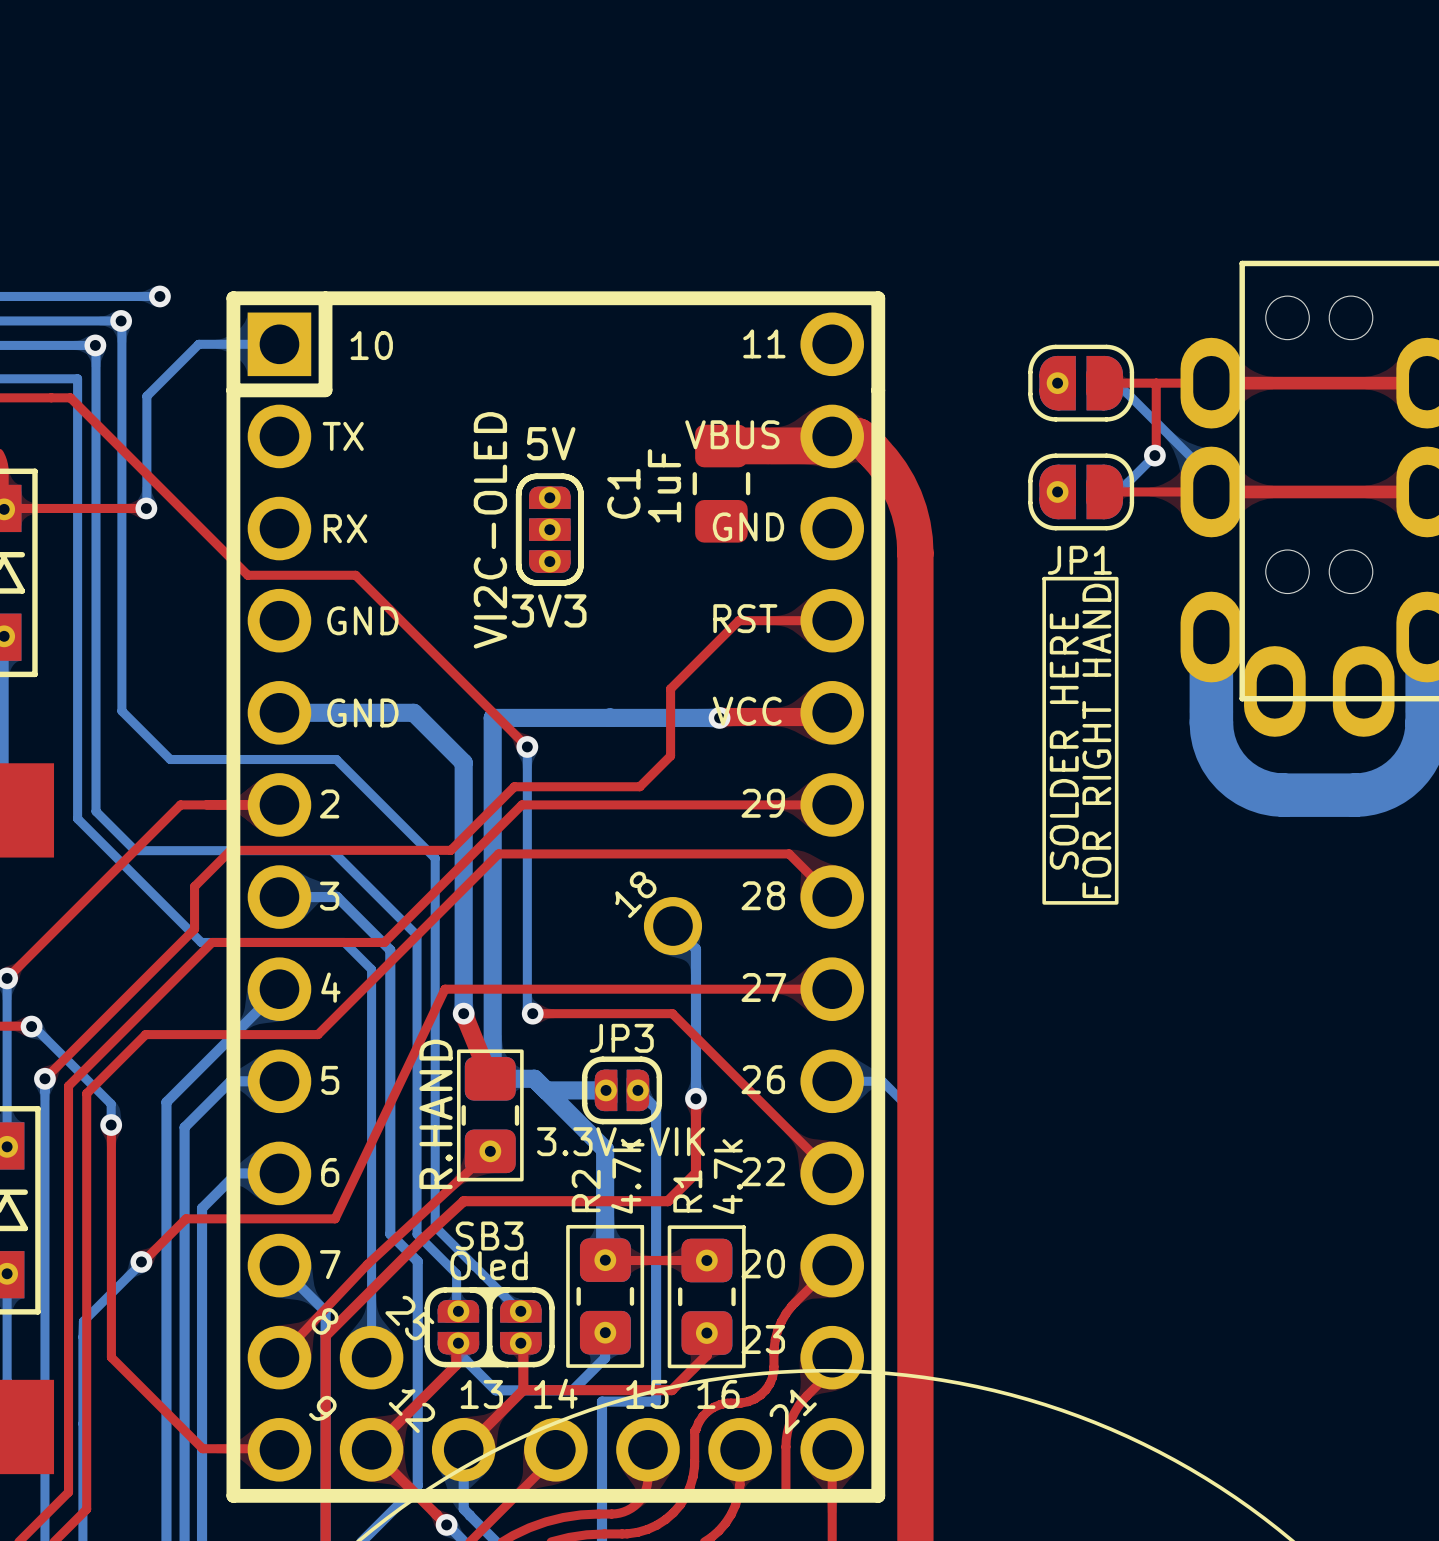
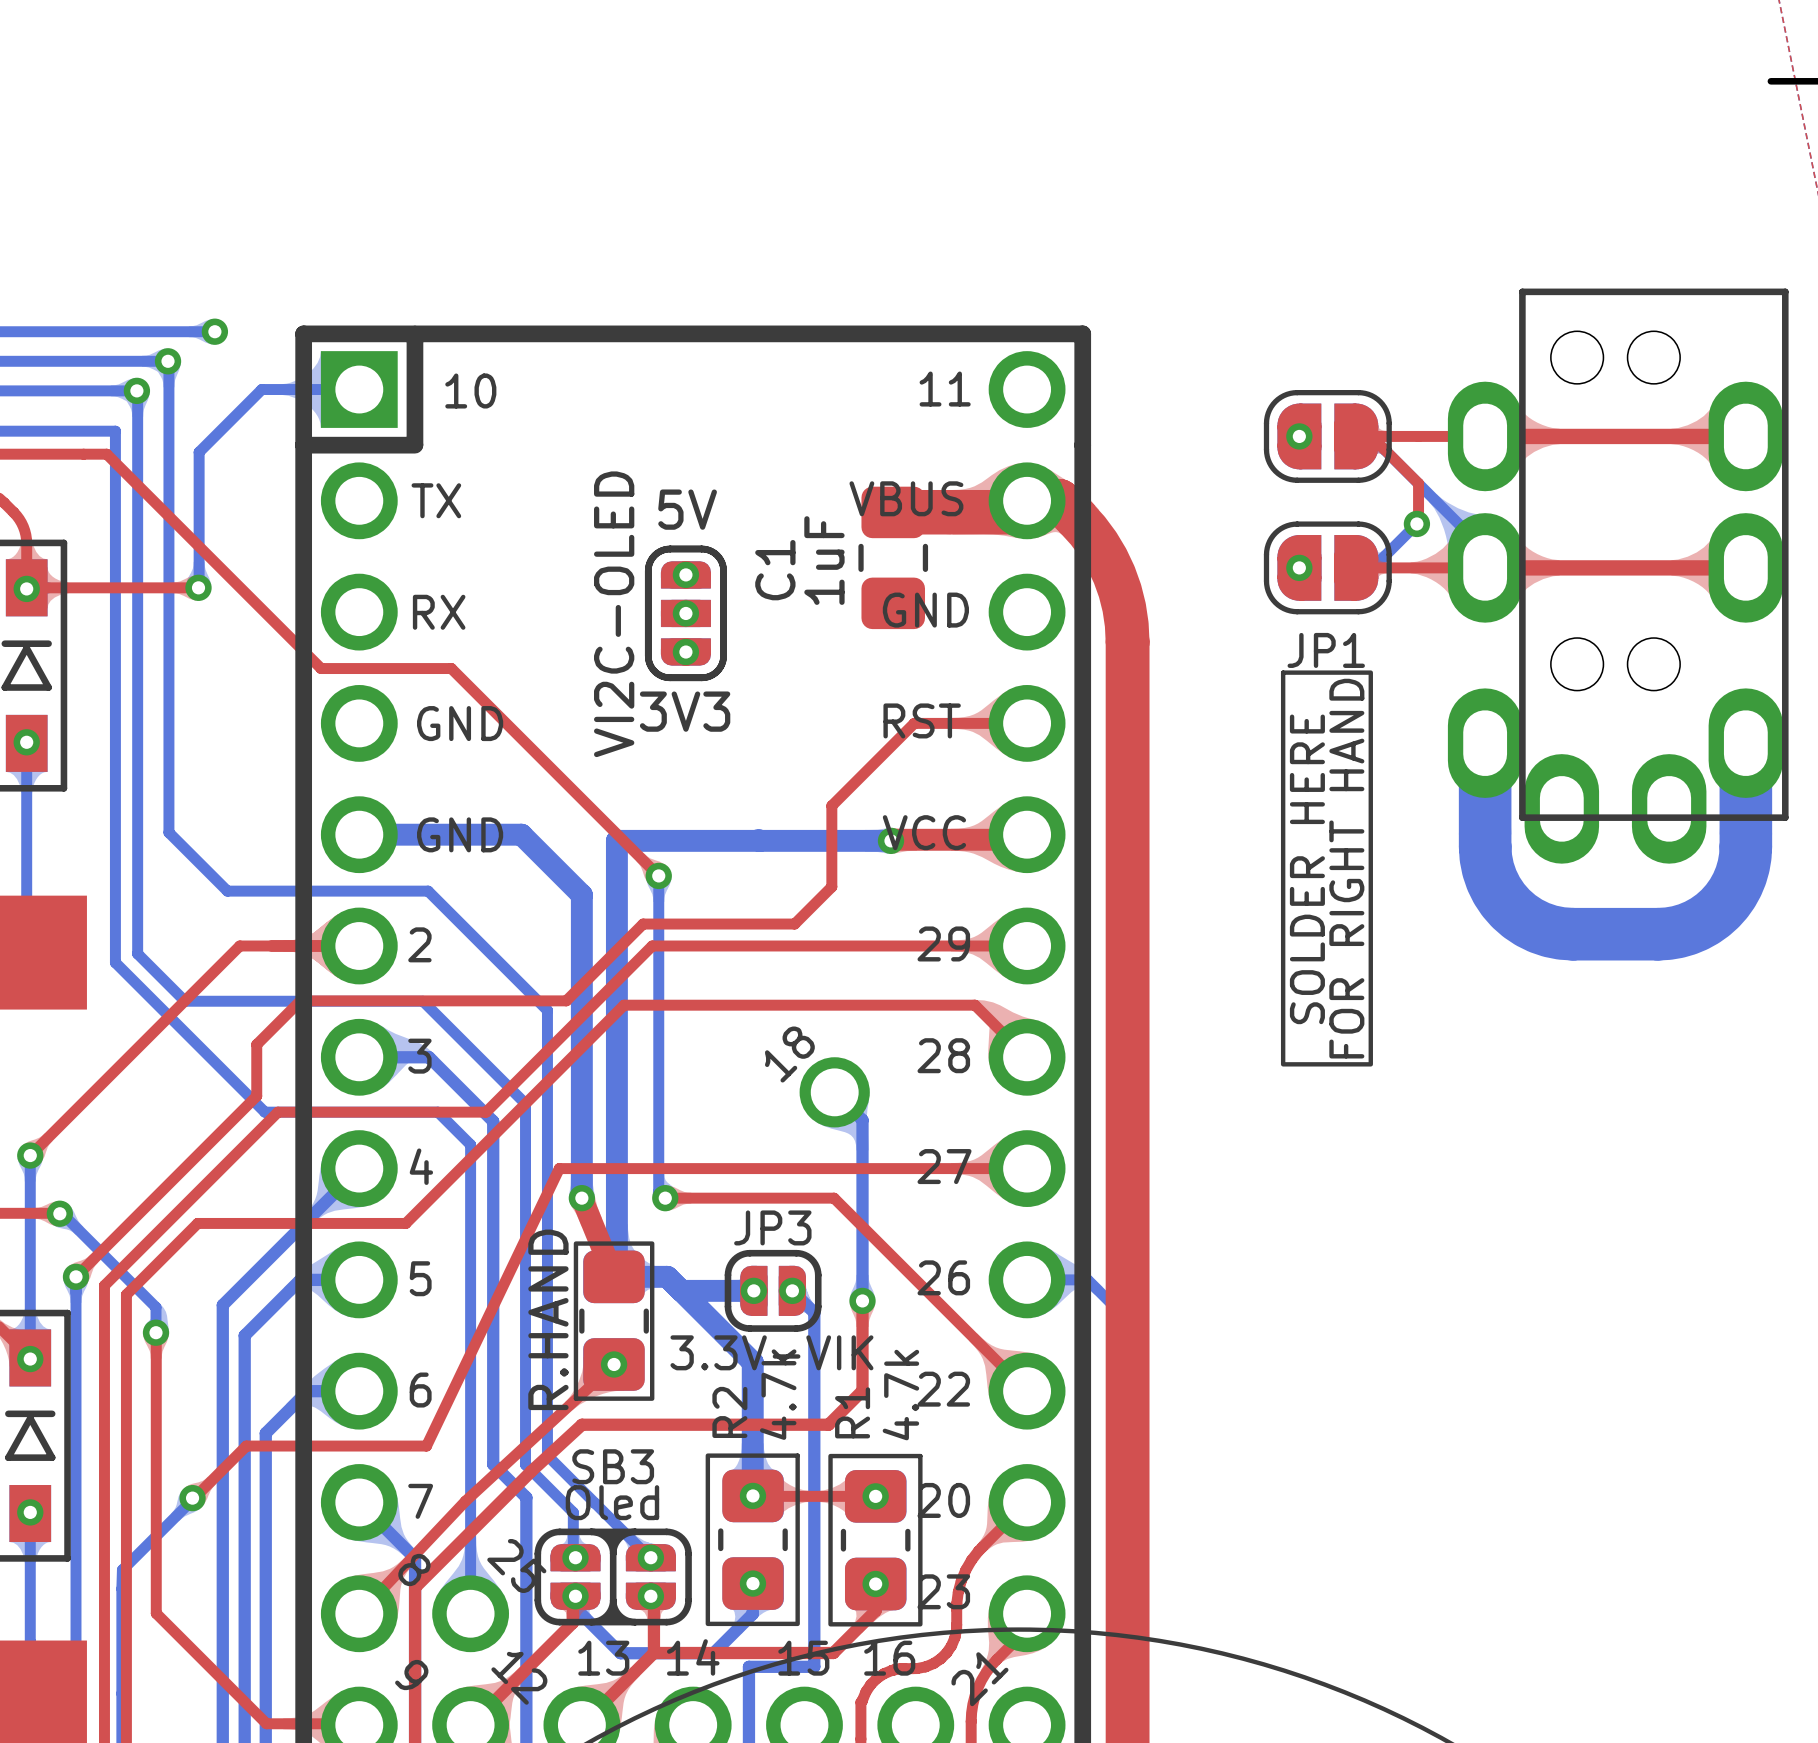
top track: (1156, 383) (1156, 422) -> (1371, 436) (1418, 483)

